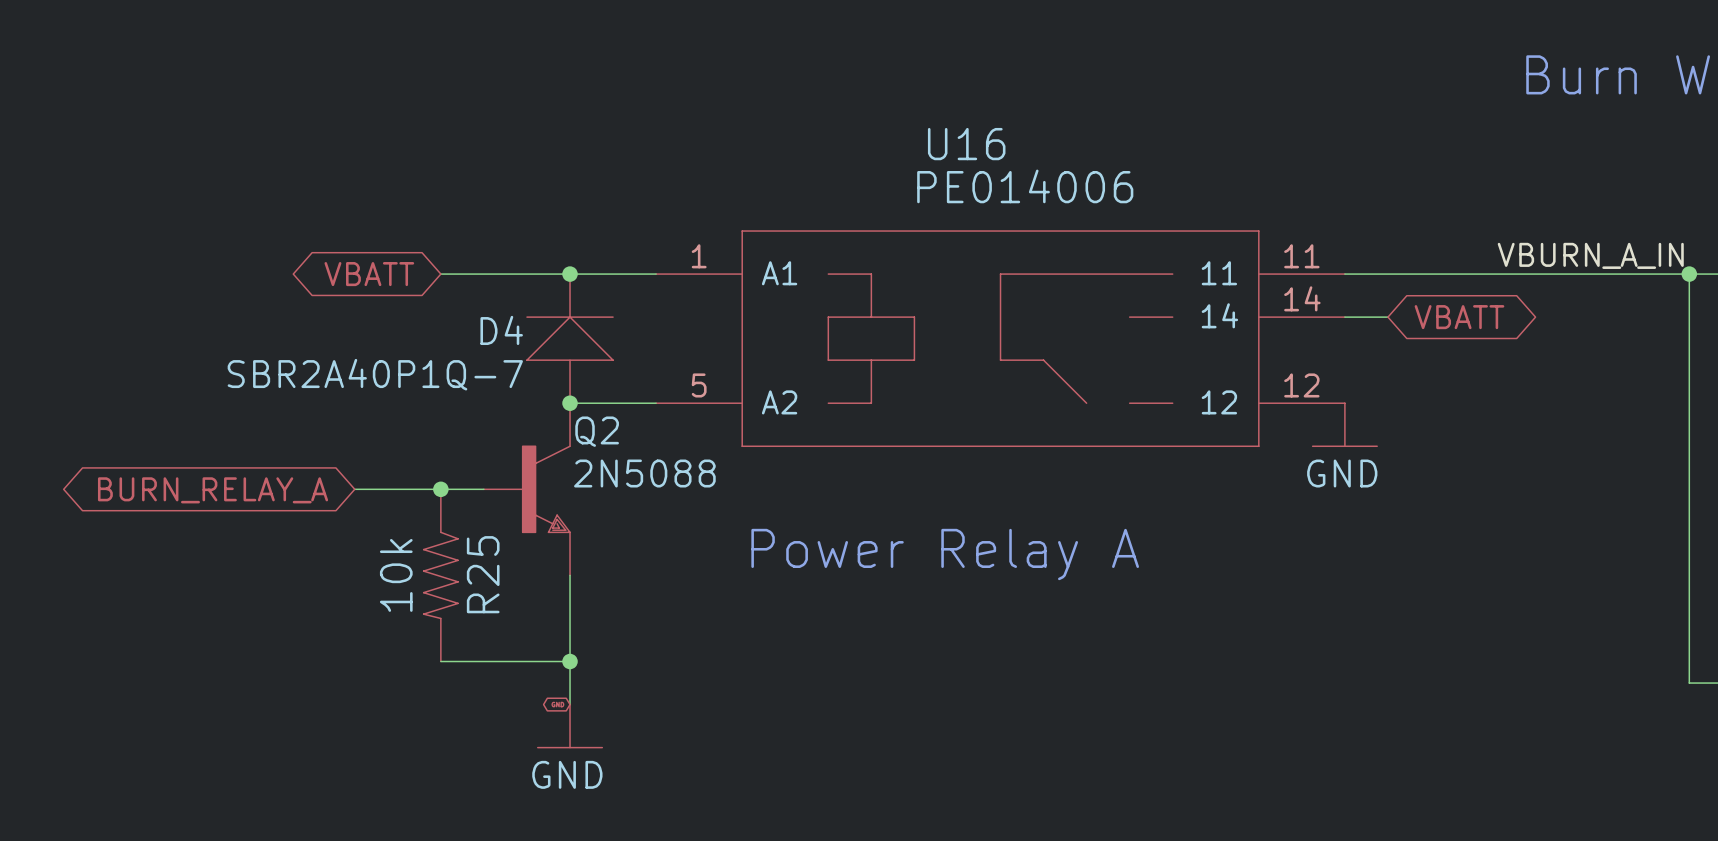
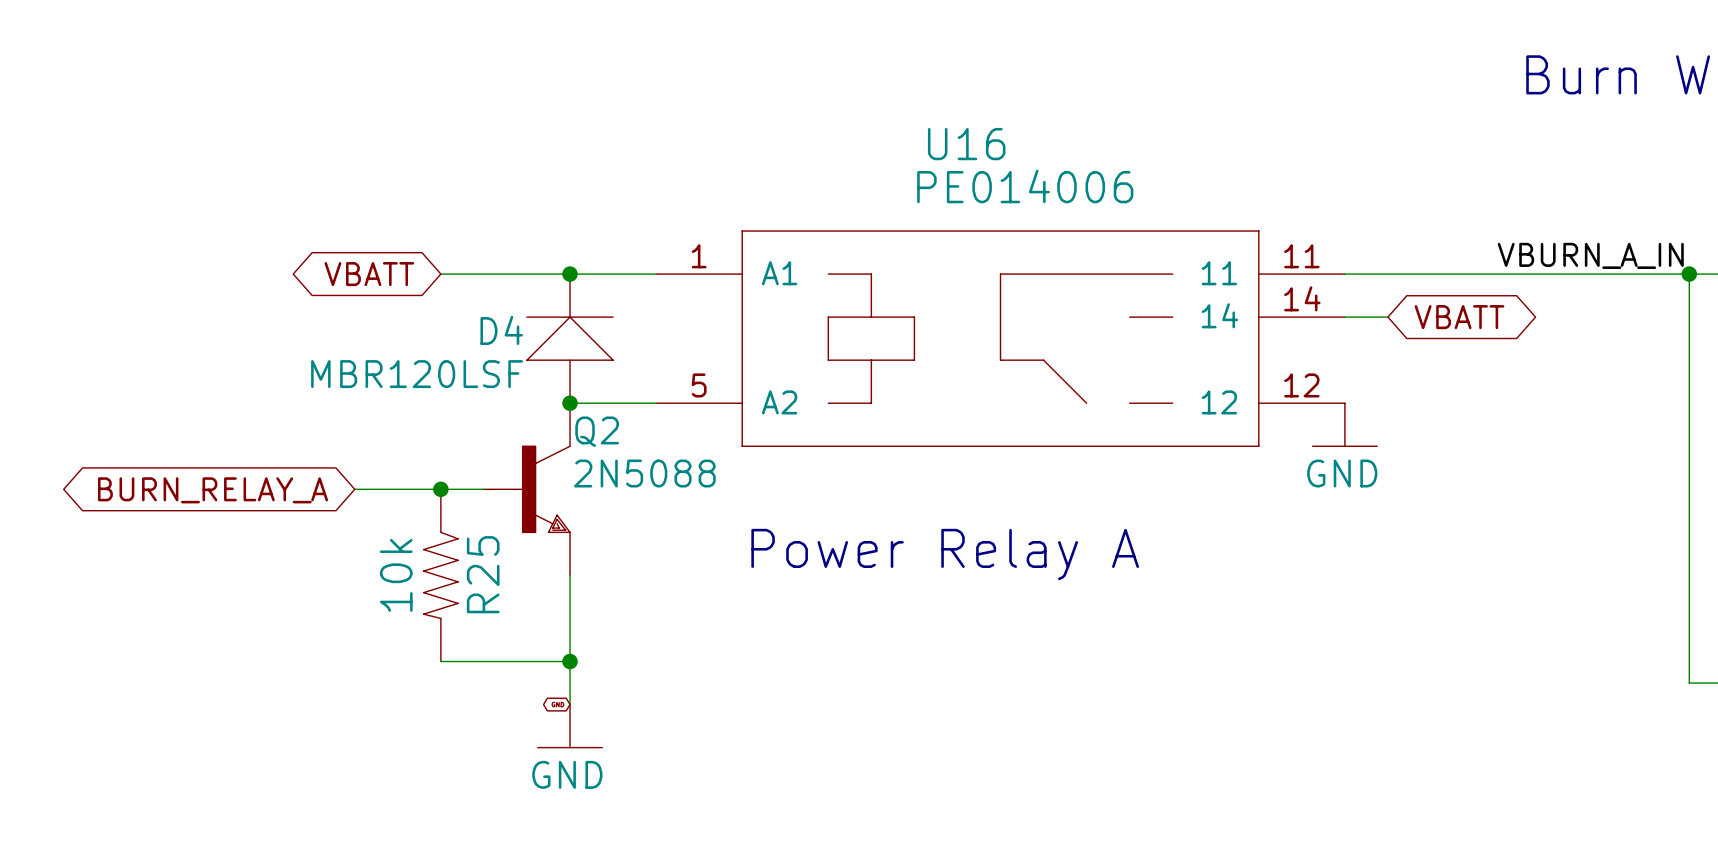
D4 value: SBR2A40P1Q-7 (375, 374) -> MBR120LSF (417, 374)

